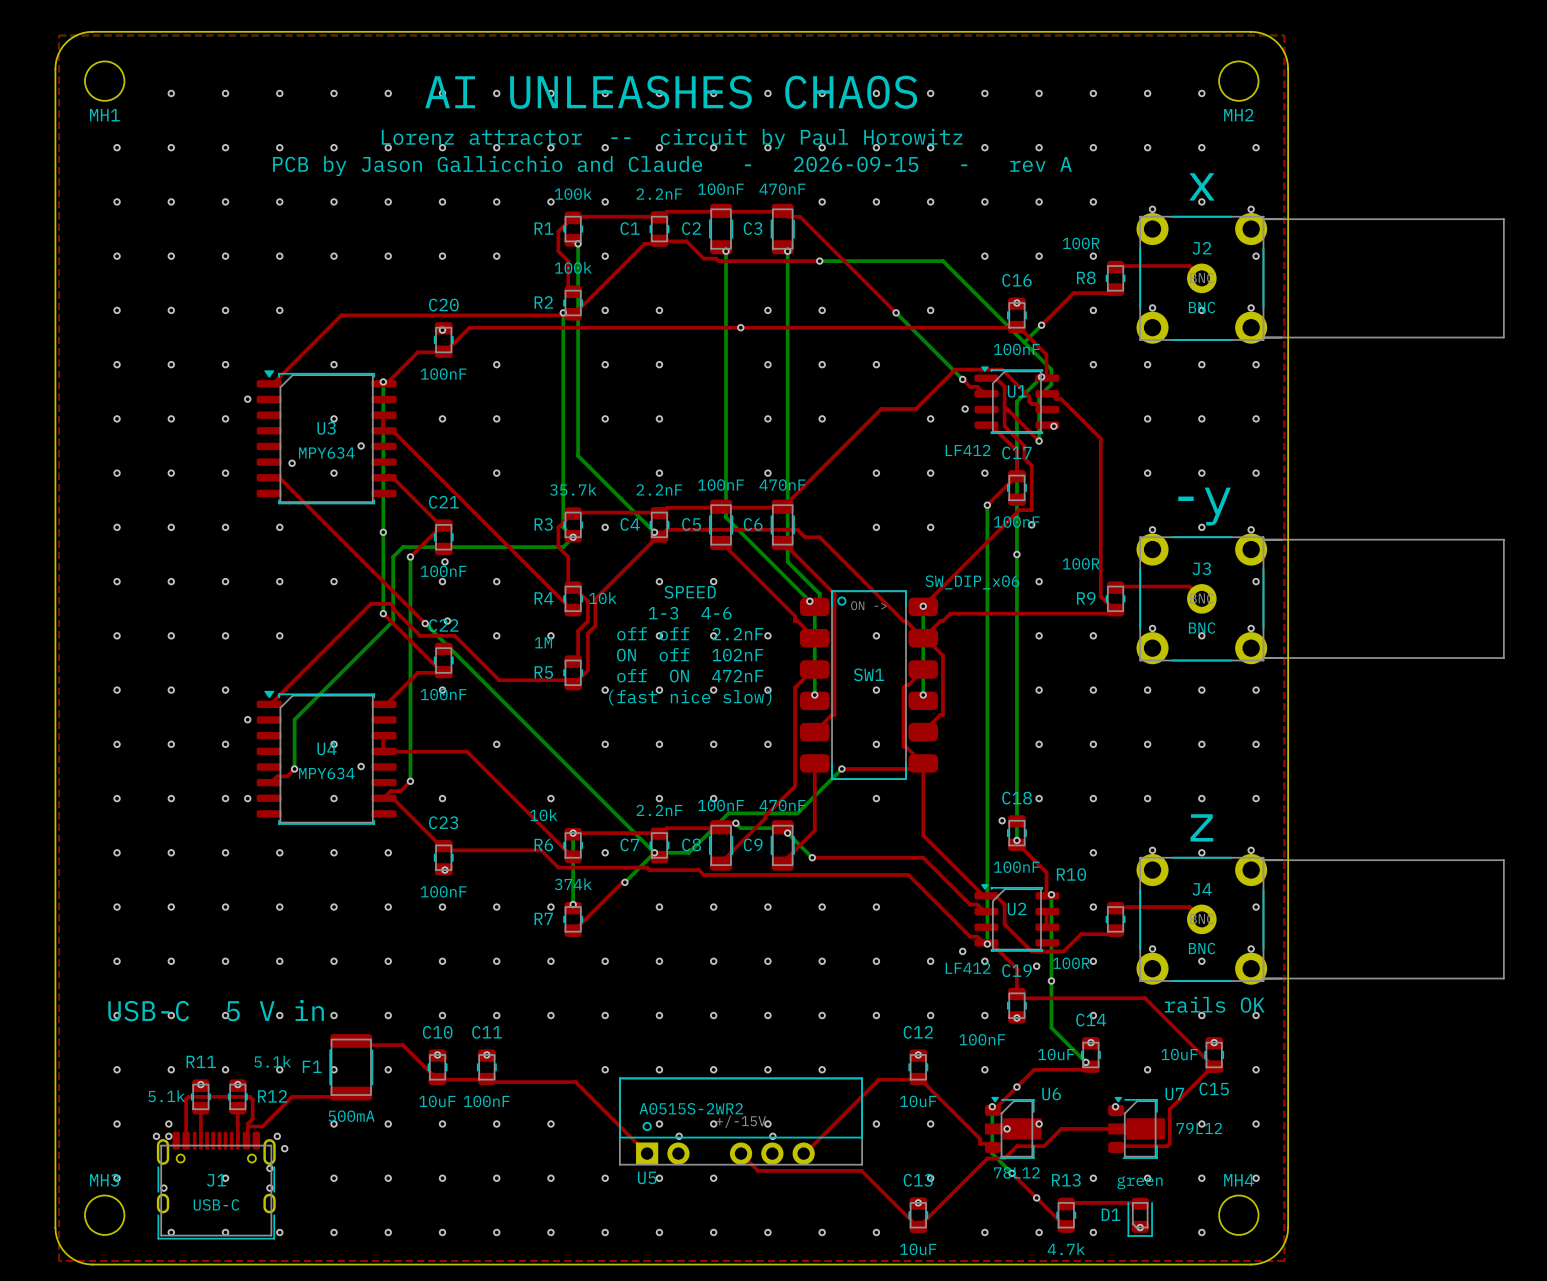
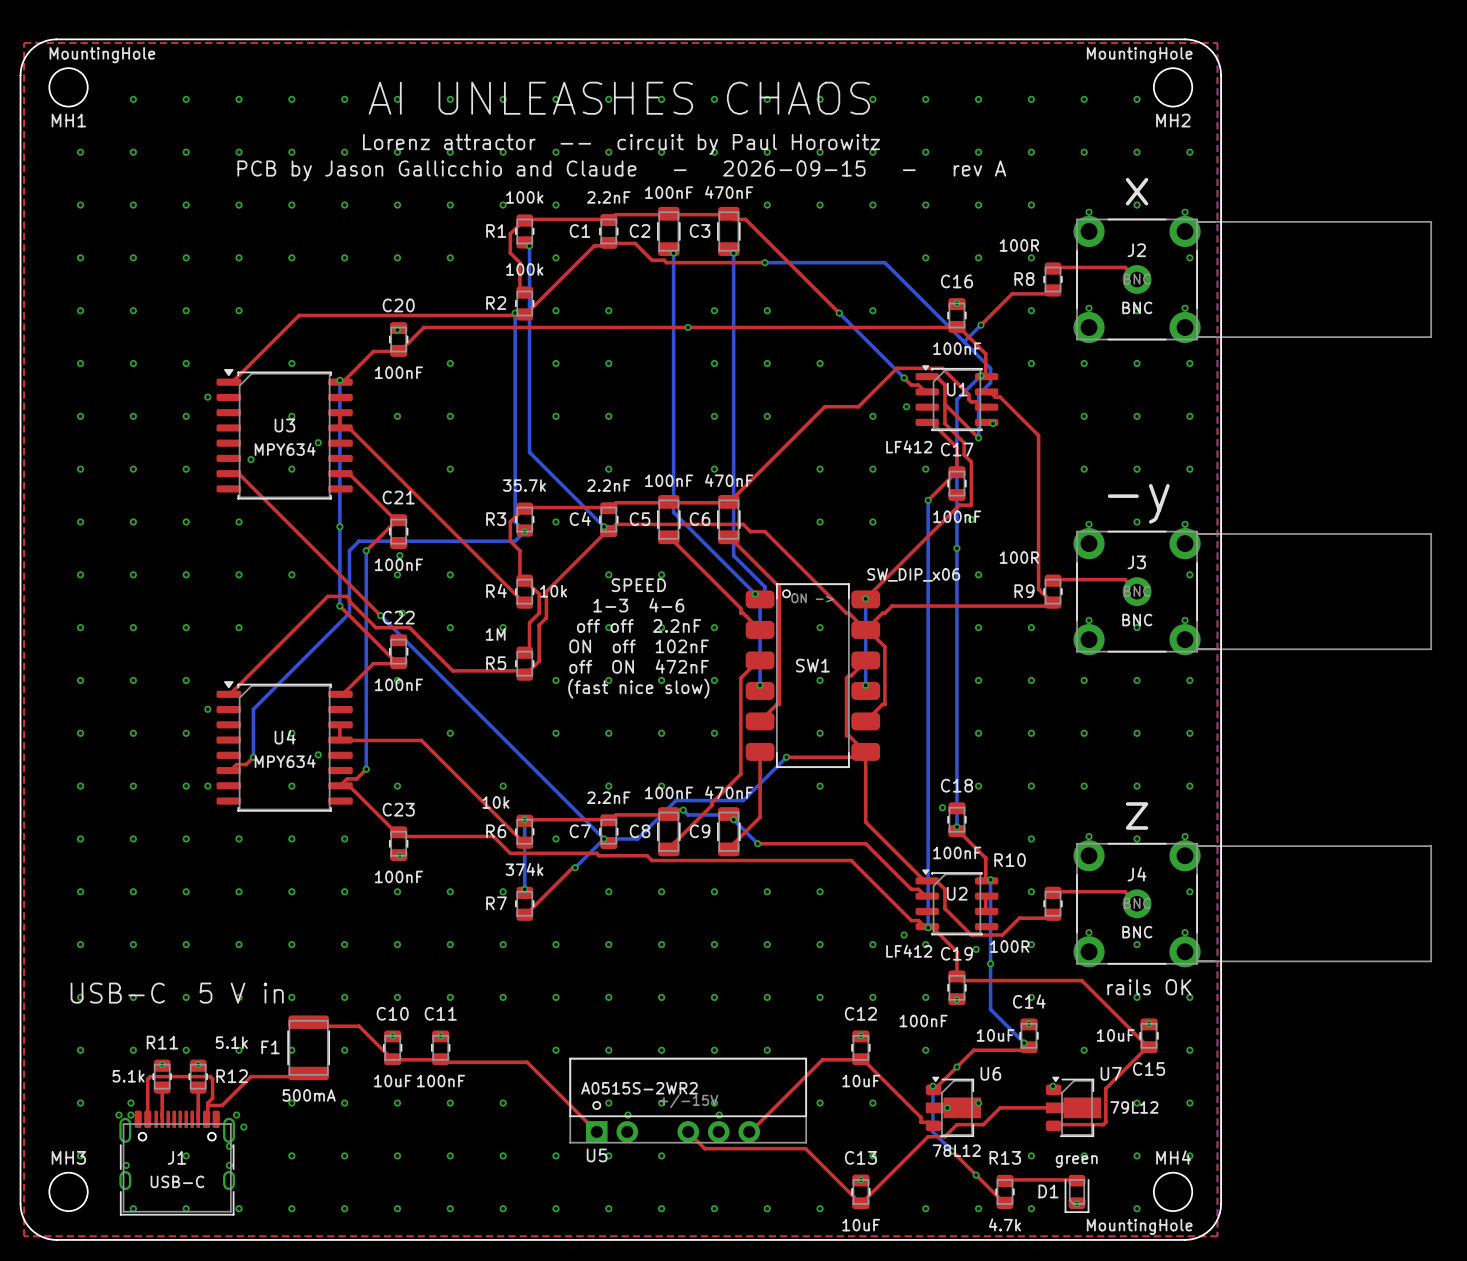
MH1 value: none -> MountingHole (102, 55)
MH2 value: none -> MountingHole (1139, 55)
MH4 value: none -> MountingHole (1139, 1226)

